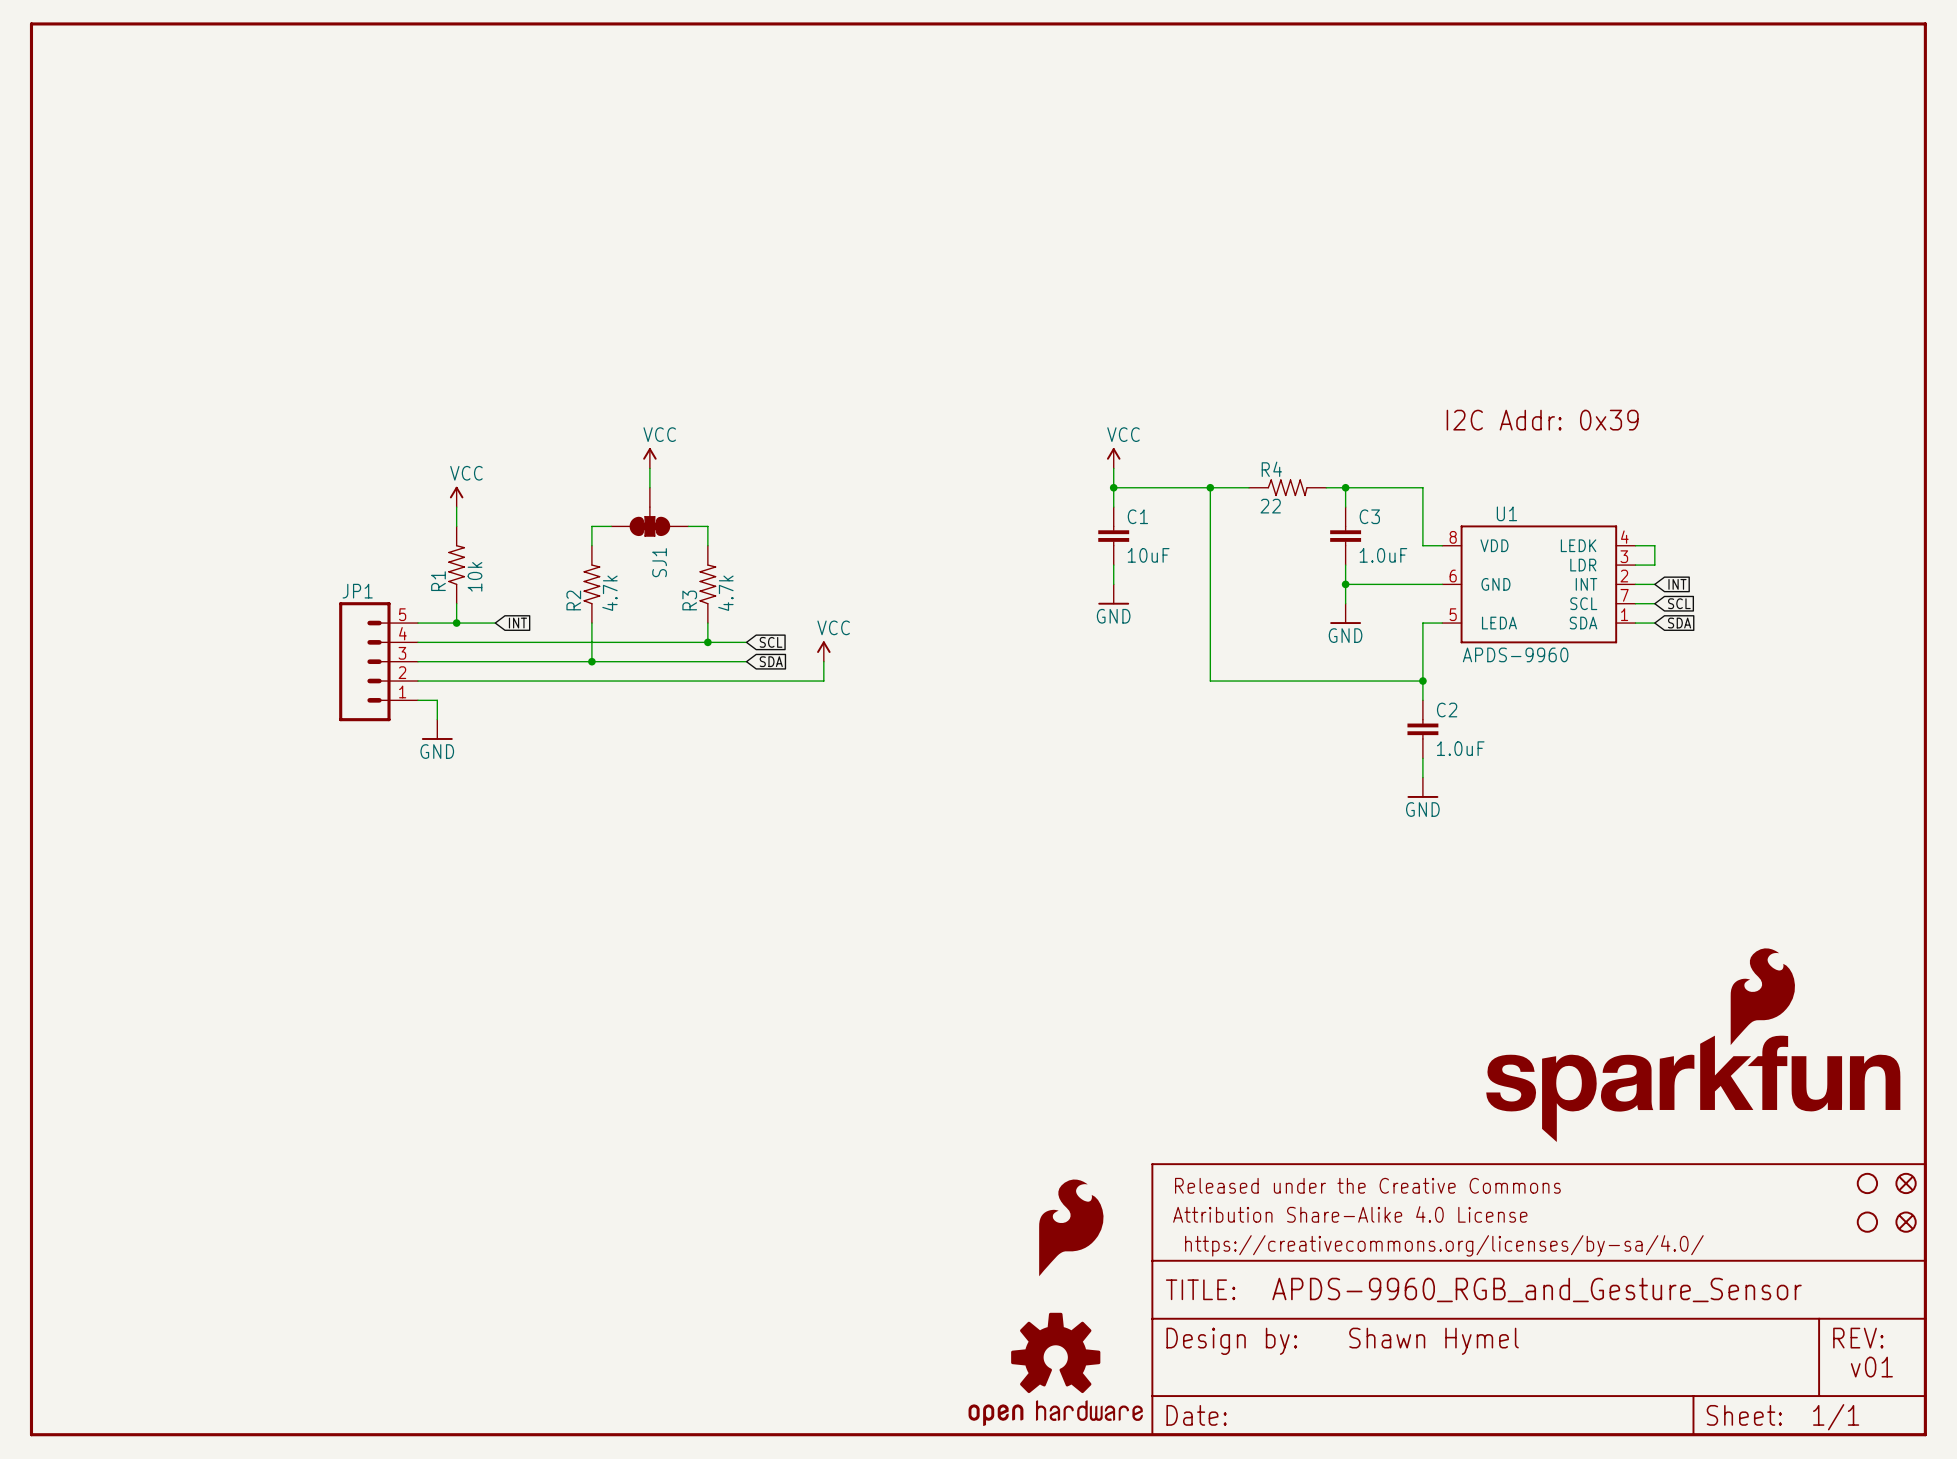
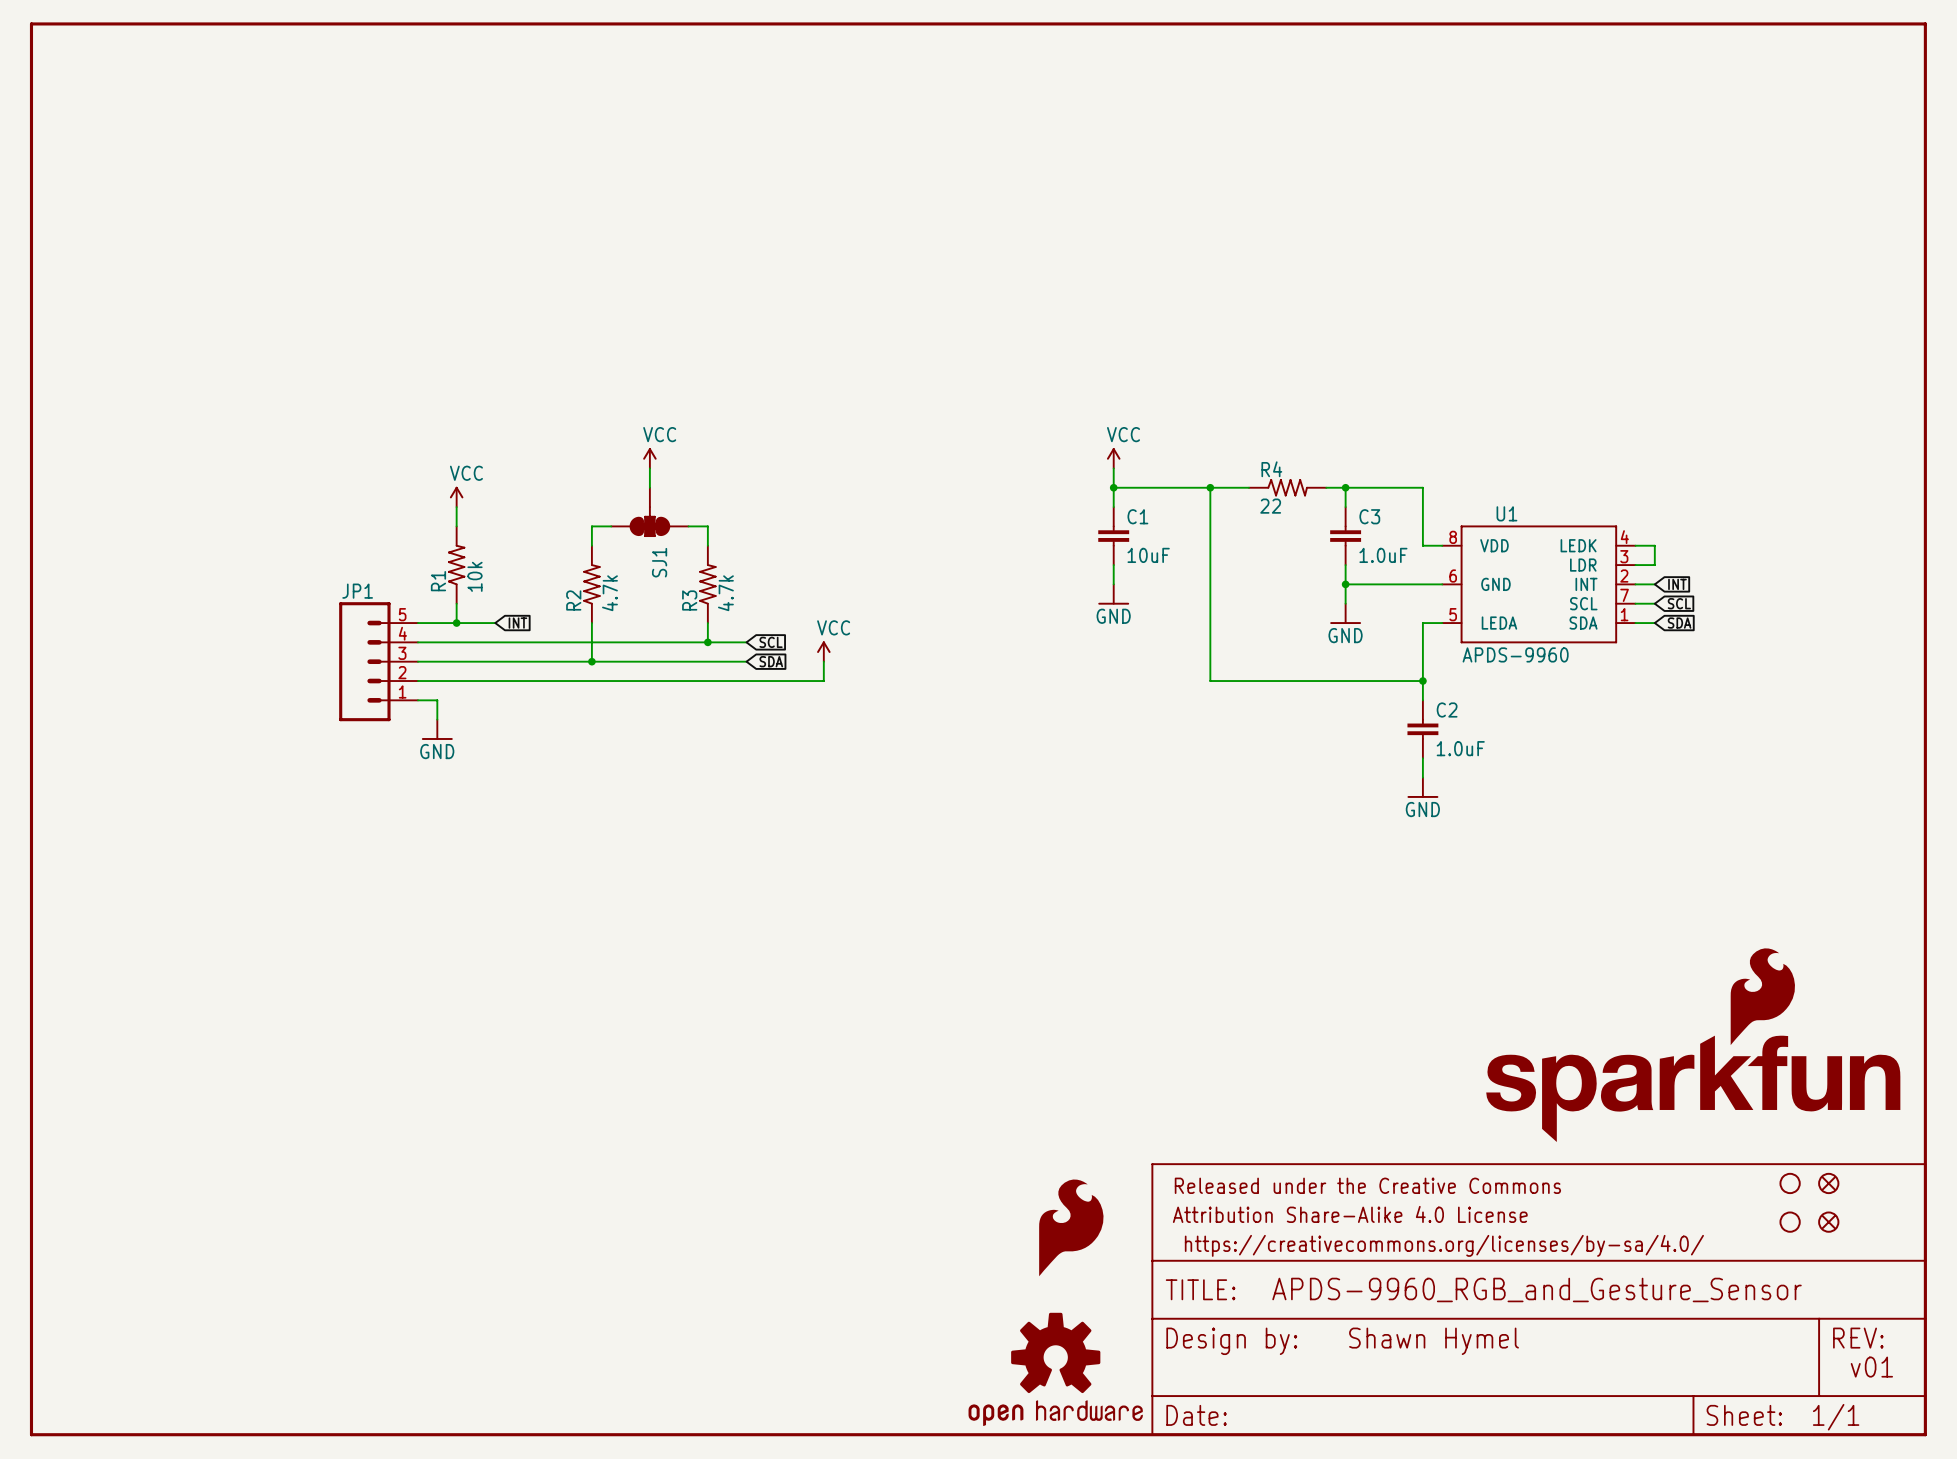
text: I2C Addr: 0x39 (1542, 420) -> none
part: none -> (1790, 1183)
part: none -> (1828, 1183)
part: (1867, 1183) -> none
part: (1906, 1183) -> none
part: none -> (1790, 1222)
part: none -> (1828, 1222)
part: (1867, 1222) -> none
part: (1906, 1222) -> none

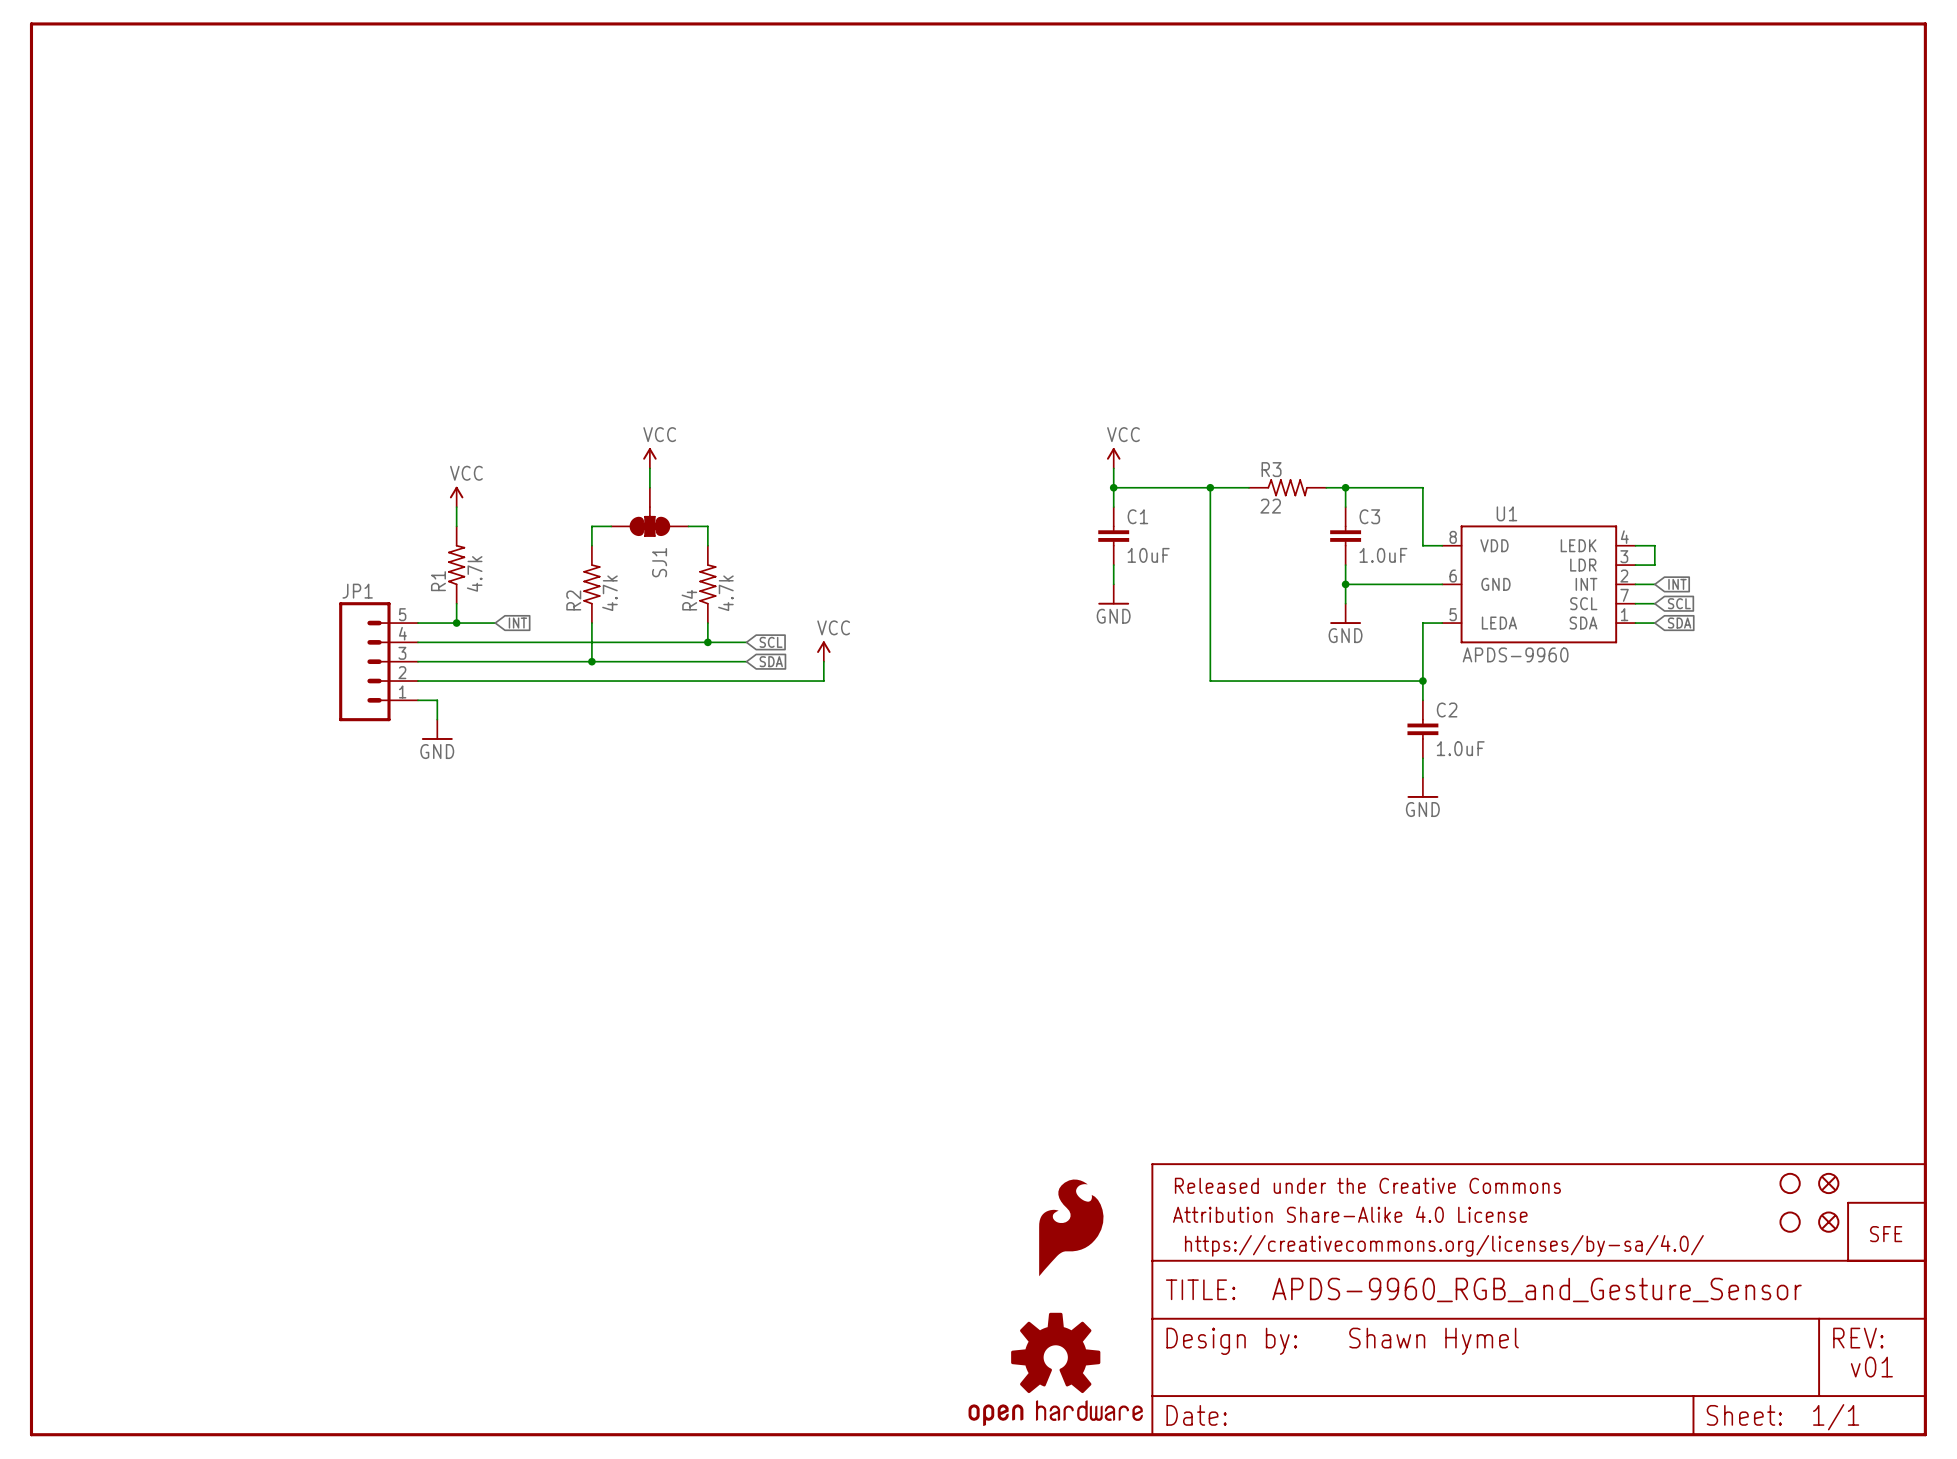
R4 name: R4 (1271, 469) -> R3 (1271, 469)
R1 value: 10k (475, 576) -> 4.7k (474, 573)
R3 name: R3 (689, 600) -> R4 (689, 600)
part: (1693, 1045) -> none
part: none -> (1886, 1231)

